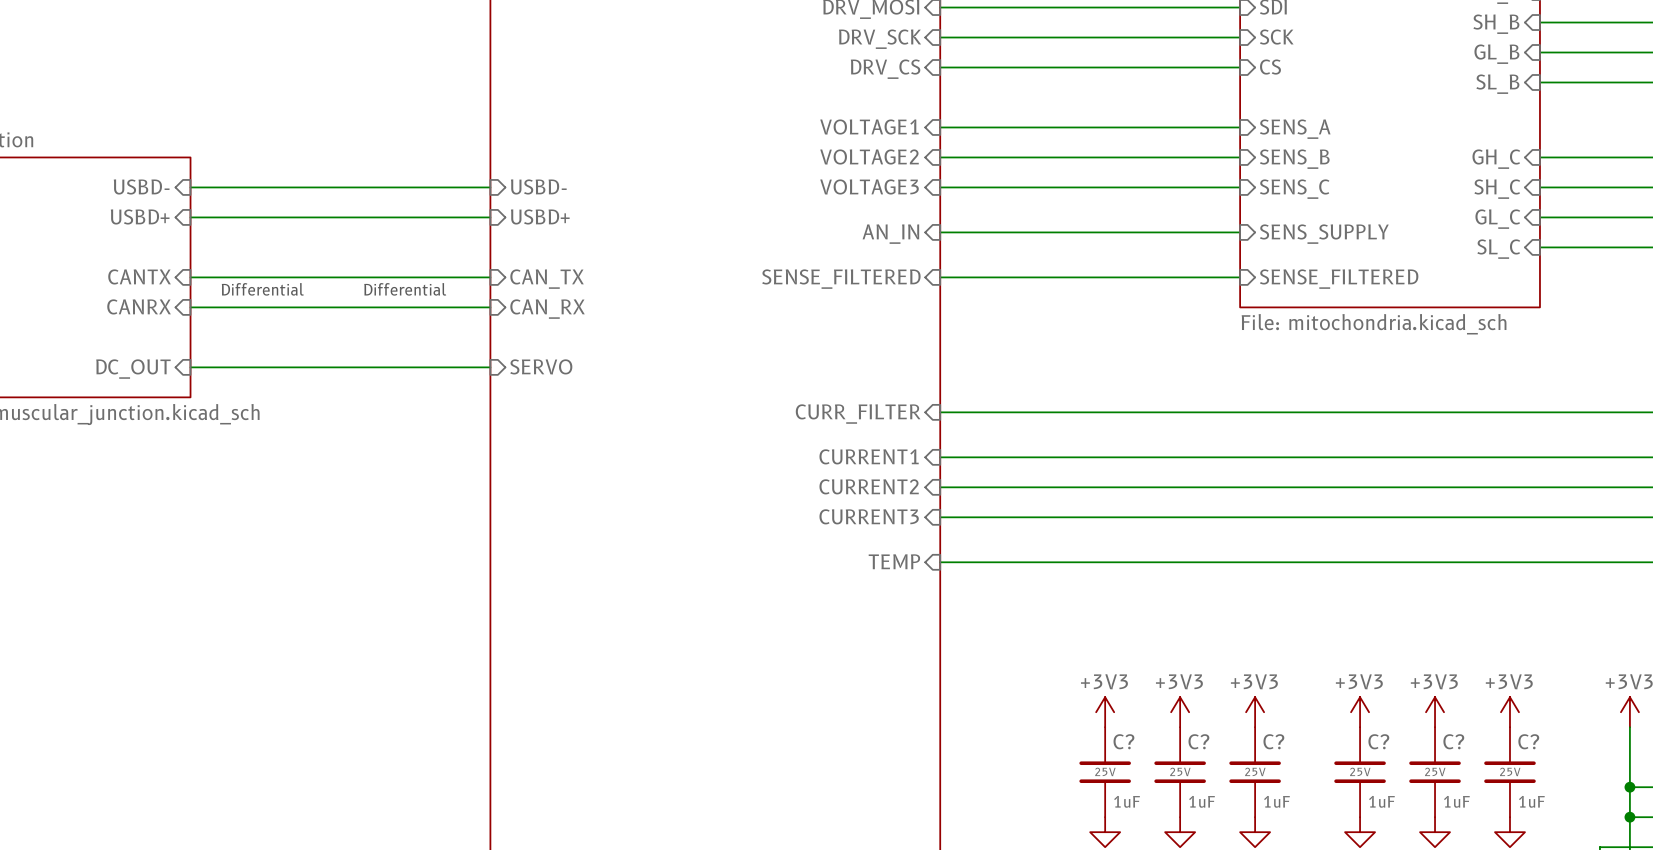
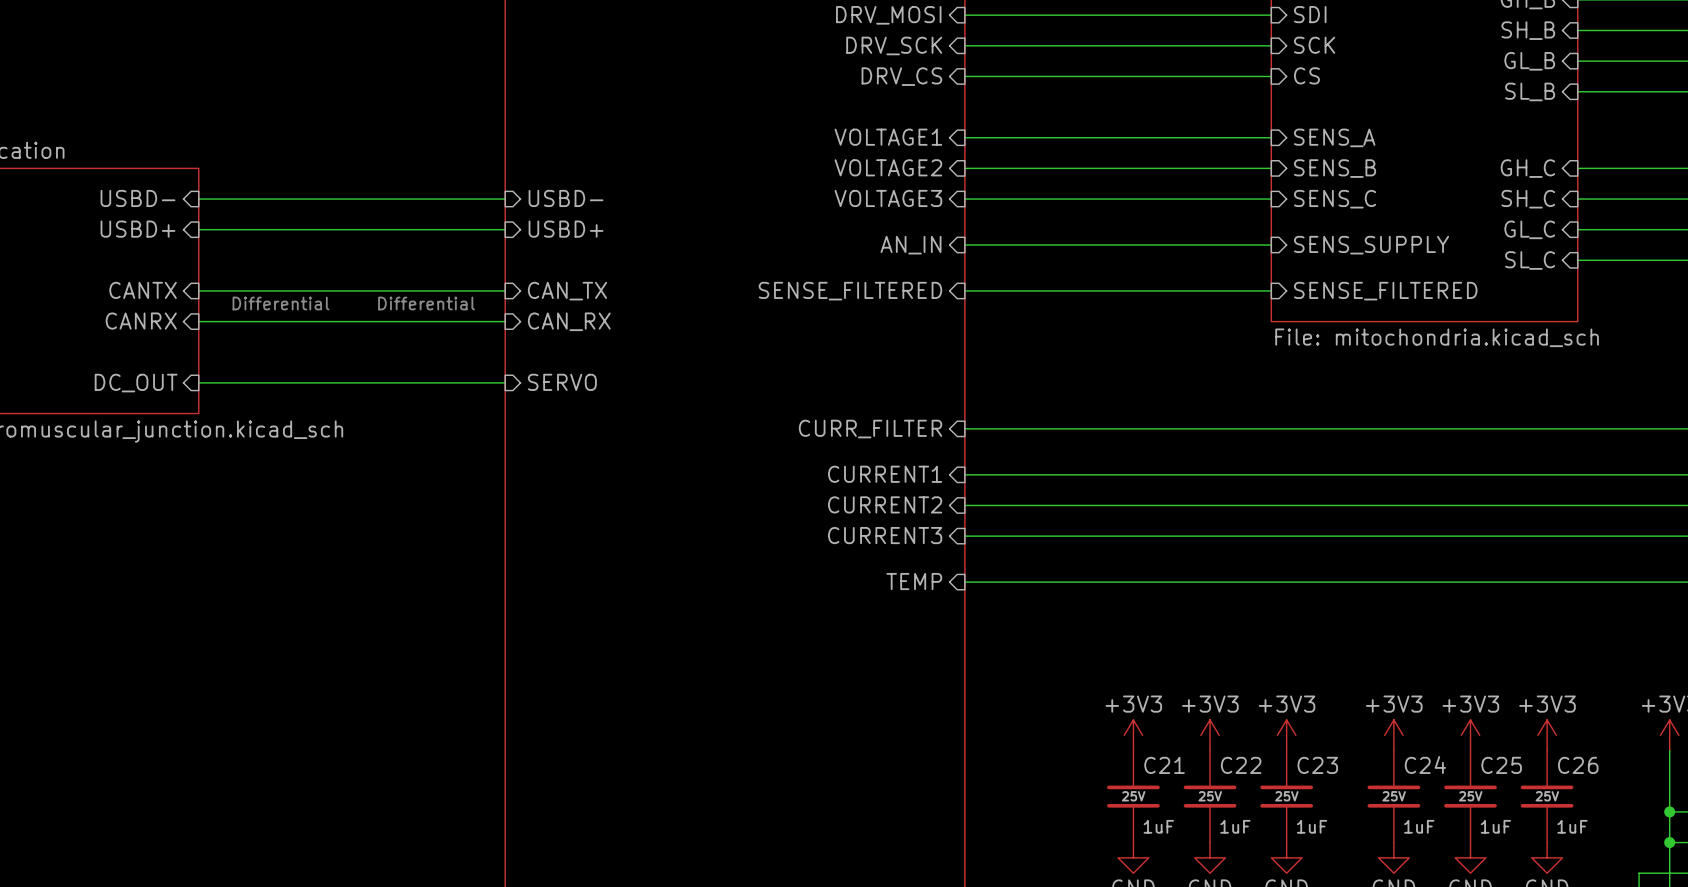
C? name: C? (1123, 741) -> C21 (1164, 765)
C? name: C? (1198, 741) -> C22 (1241, 765)
C? name: C? (1273, 741) -> C23 (1317, 765)
C? name: C? (1378, 741) -> C24 (1425, 765)
C? name: C? (1453, 741) -> C25 (1501, 765)
C? name: C? (1528, 741) -> C26 (1578, 765)

